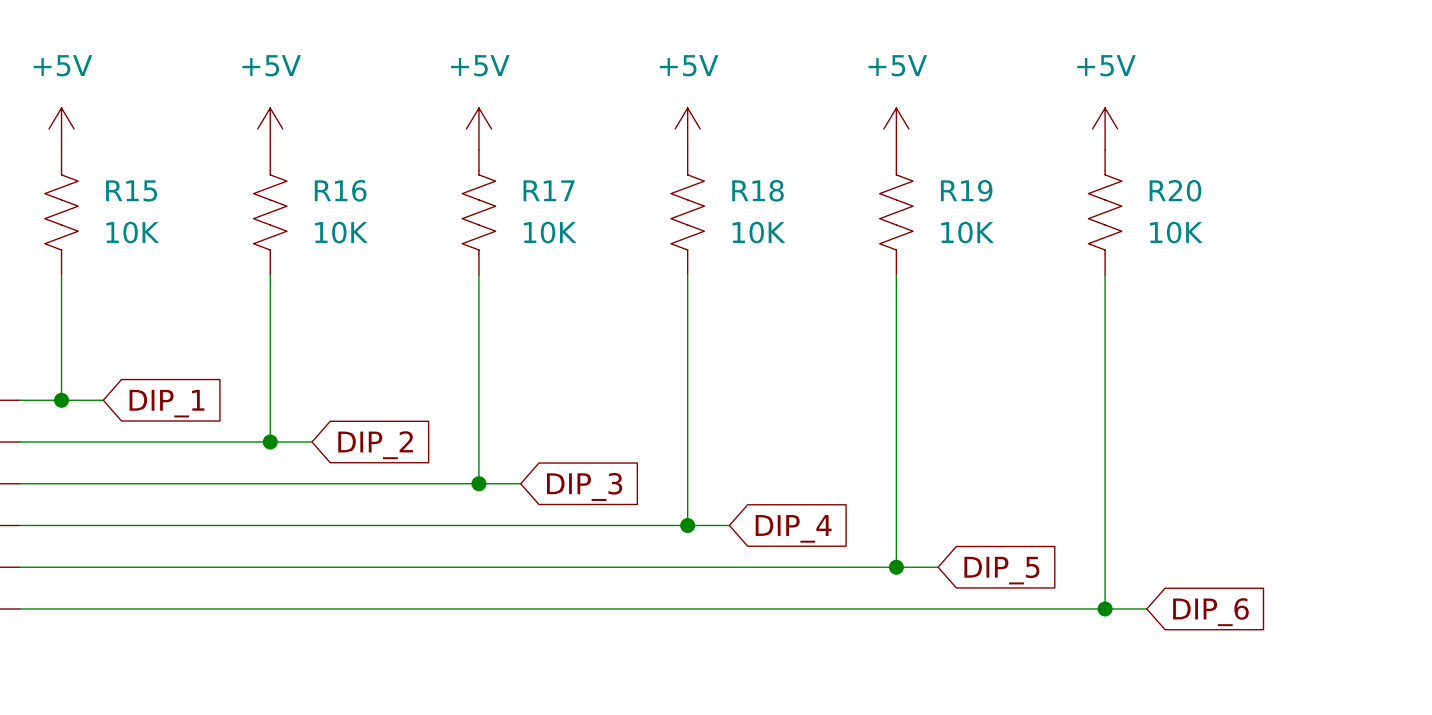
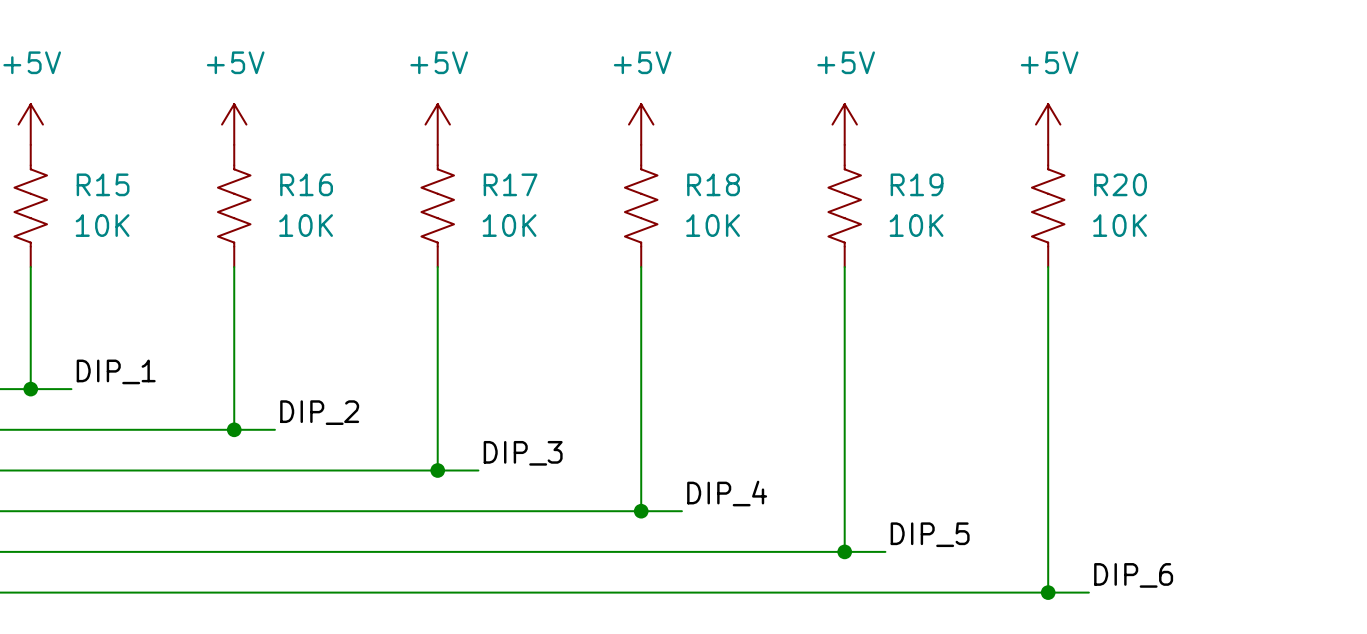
label: none -> DIP_1 (116, 371)
global label: DIP_1 (166, 403) -> none
label: none -> DIP_2 (319, 412)
global label: DIP_2 (375, 445) -> none
label: none -> DIP_3 (523, 453)
global label: DIP_3 (584, 486) -> none
label: none -> DIP_4 (727, 493)
global label: DIP_4 (793, 528) -> none
label: none -> DIP_5 (930, 534)
global label: DIP_5 (1001, 570) -> none
label: none -> DIP_6 (1133, 575)
global label: DIP_6 (1210, 612) -> none

